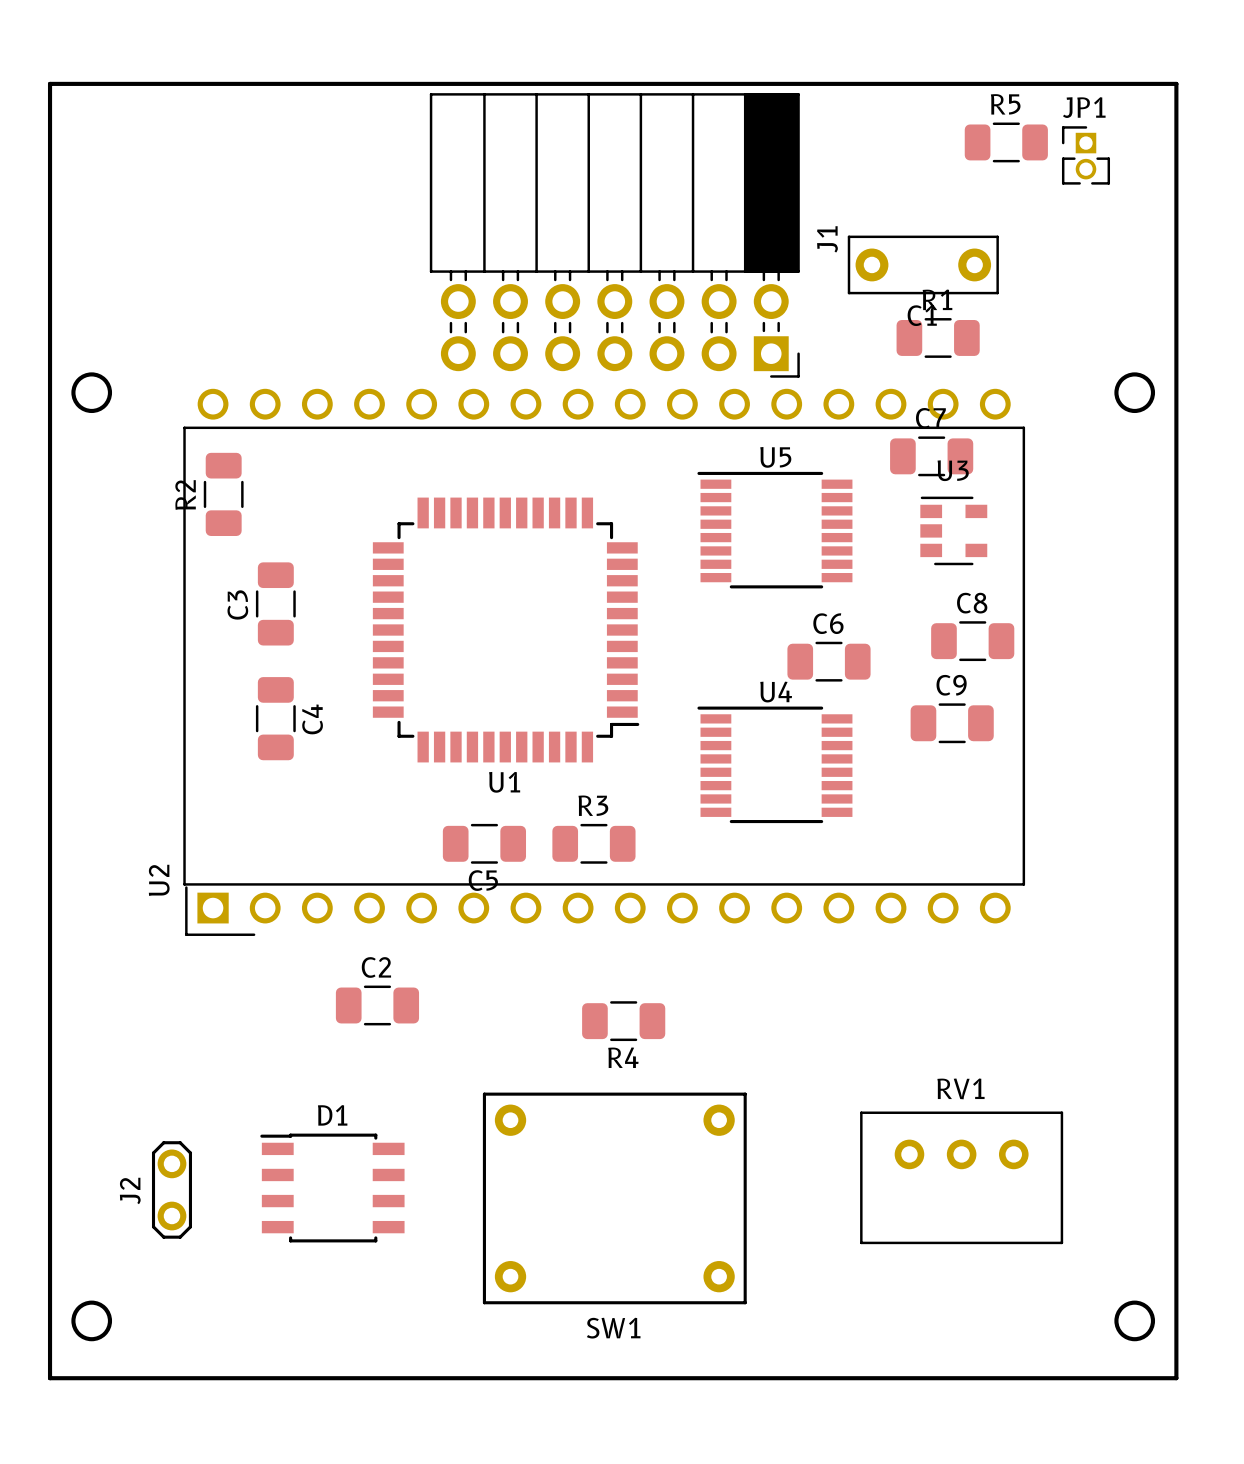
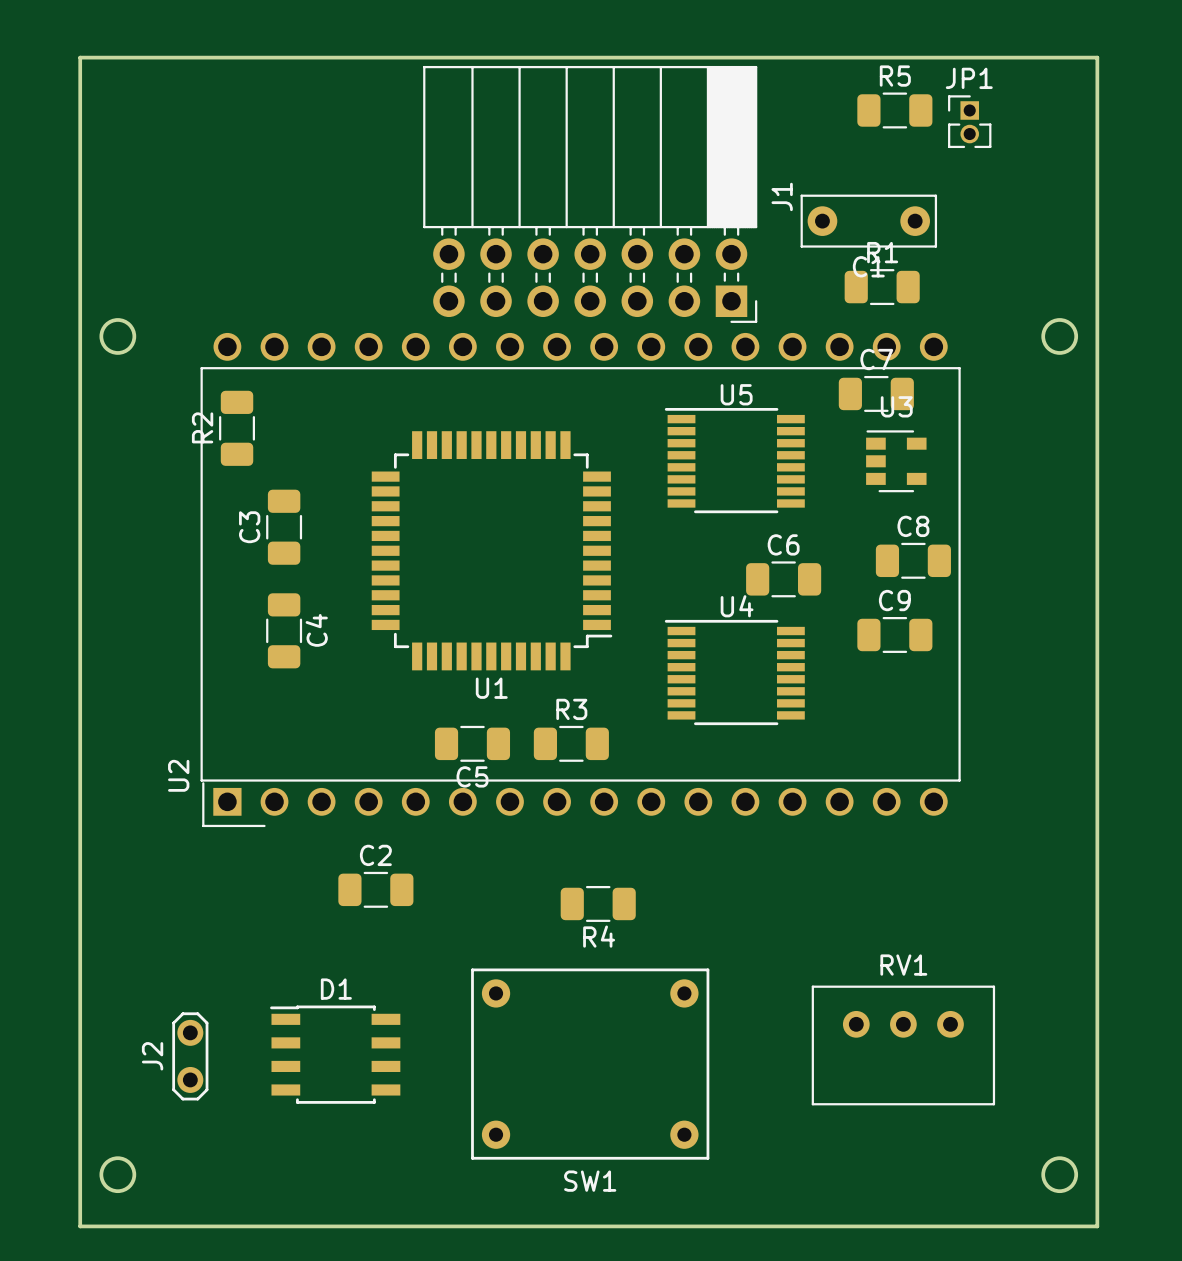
R5 position: (1006, 142) -> (894, 110)
JP1 position: (1085, 155) -> (969, 121)

